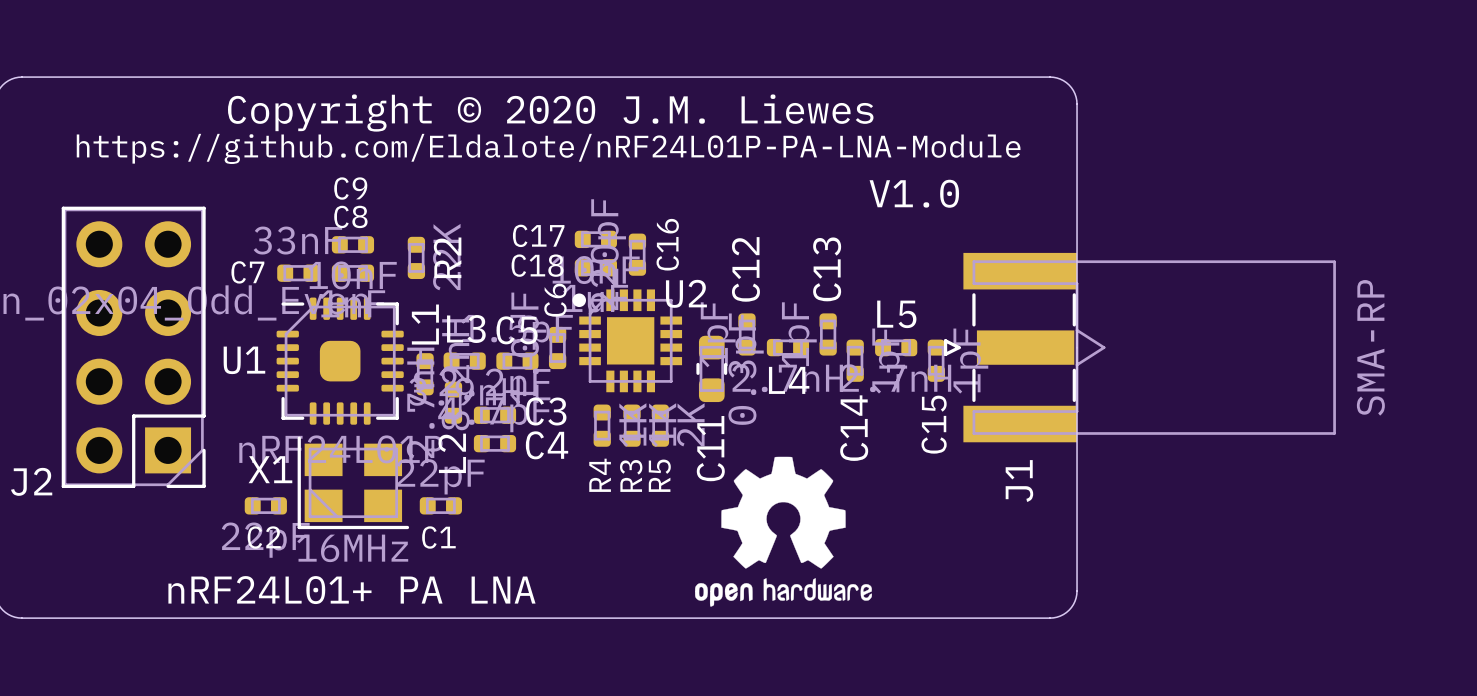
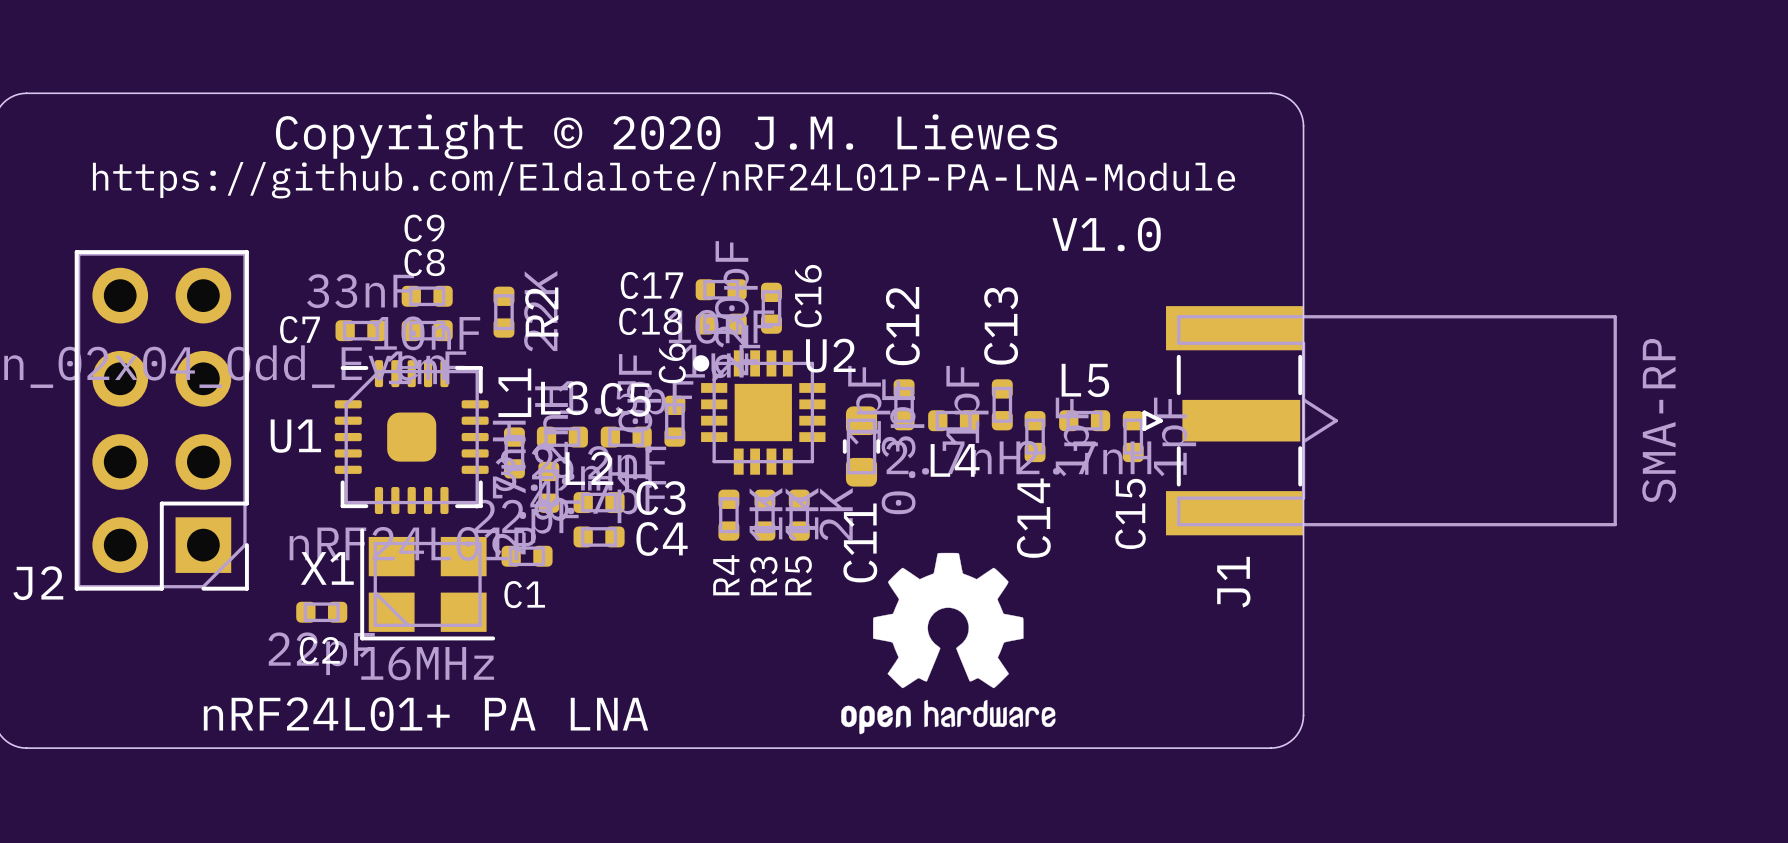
L2 name rotation: 0° (452, 453) -> 90° clockwise (589, 468)
L2 name position: L2 (452, 453) -> L2 (589, 468)
C1 position: (440, 505) -> (527, 556)

